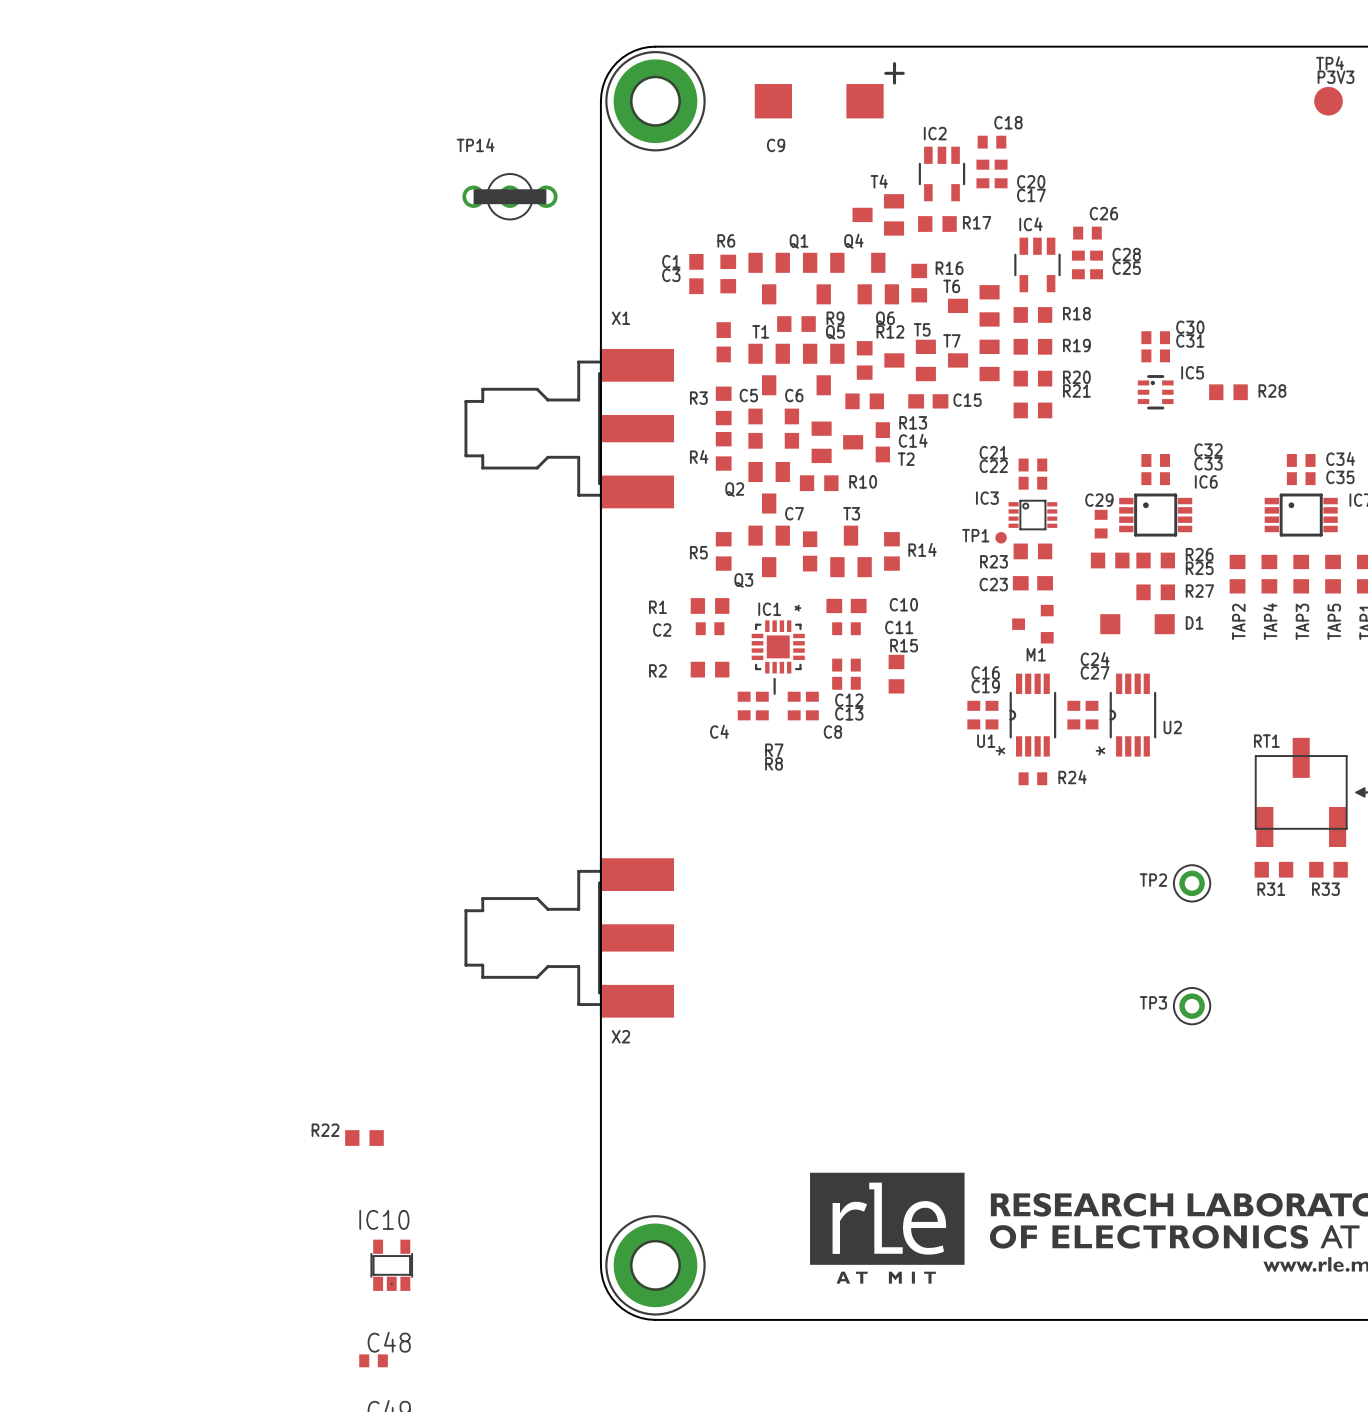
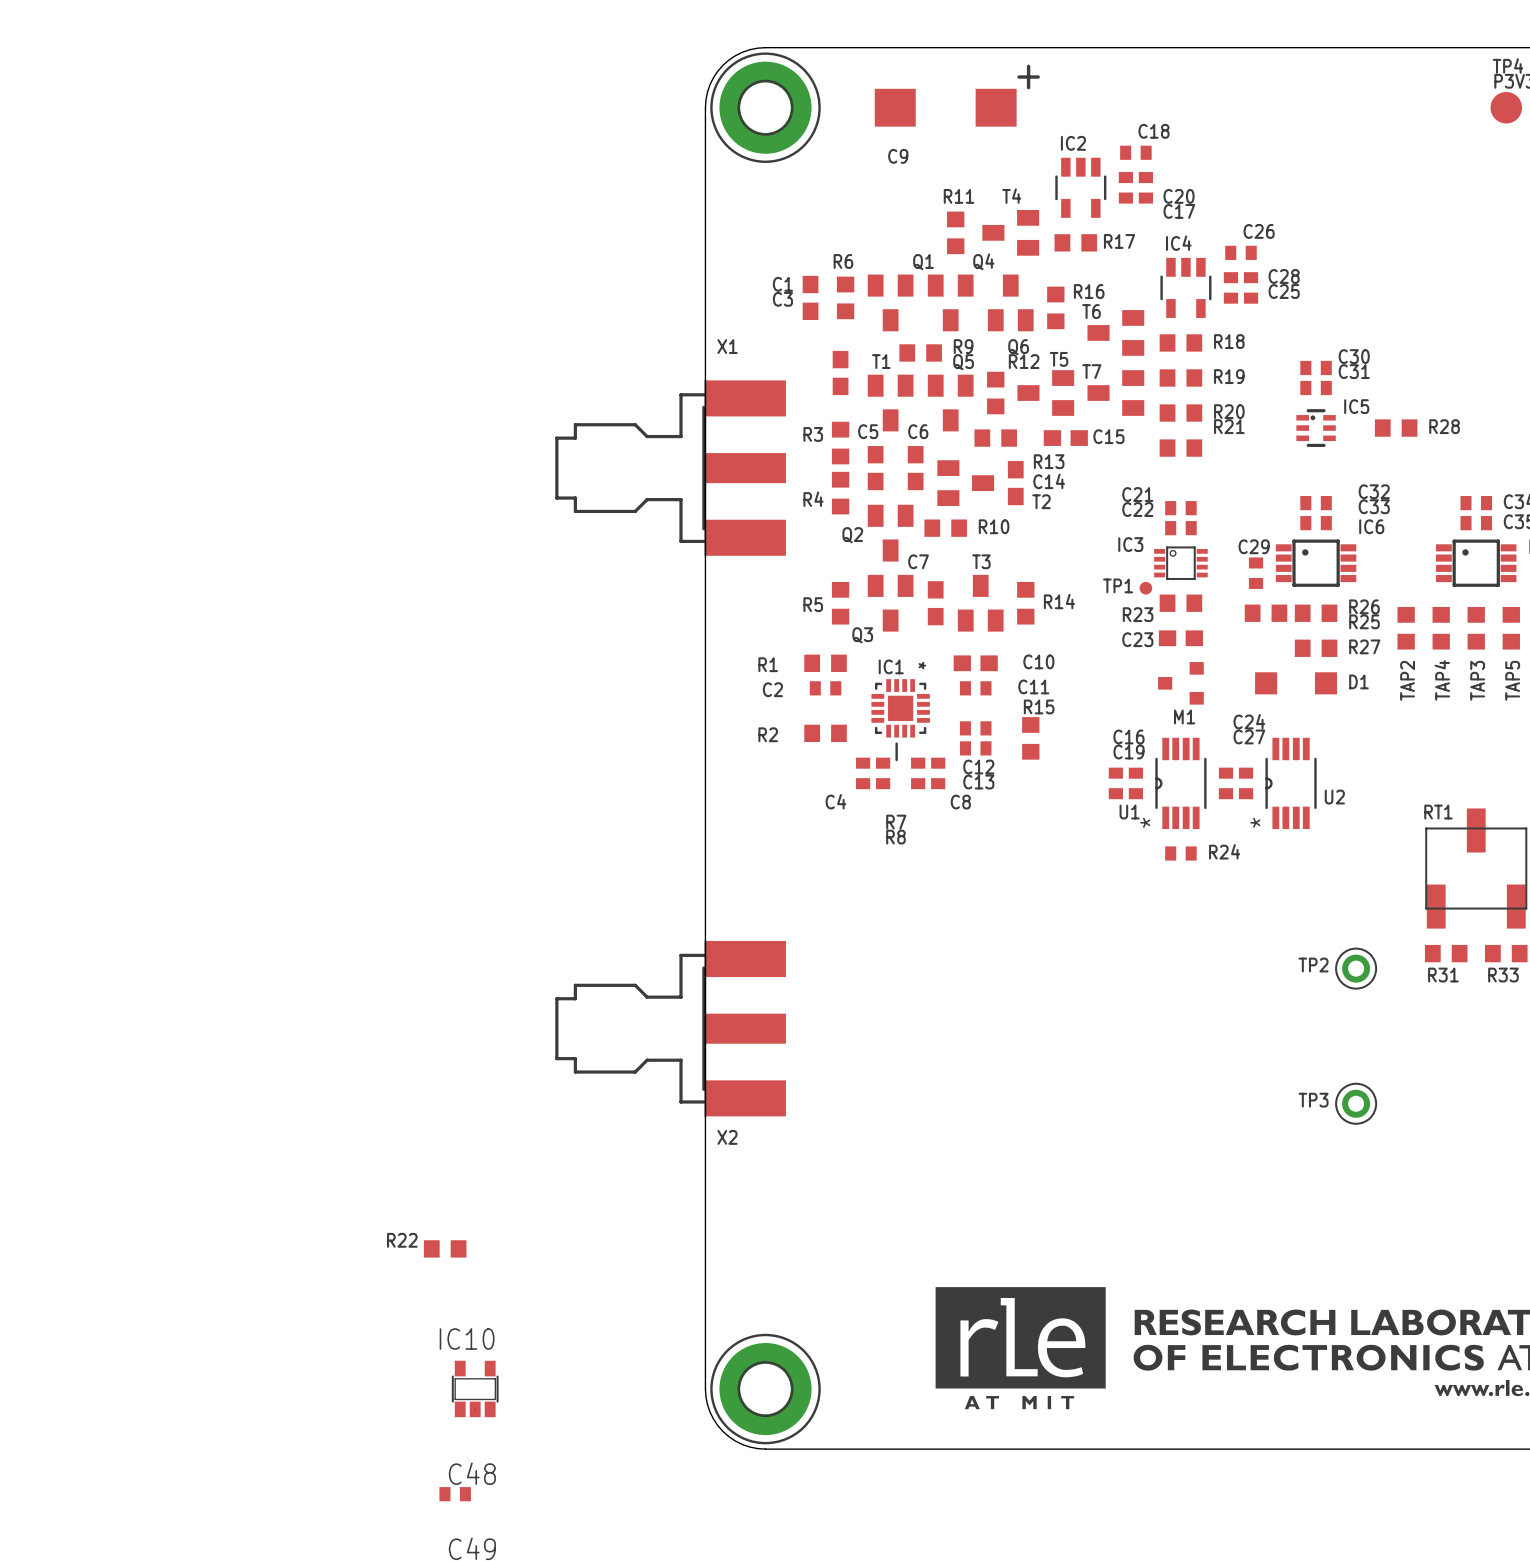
TP14: (509, 196) -> none
R11: none -> (955, 232)

